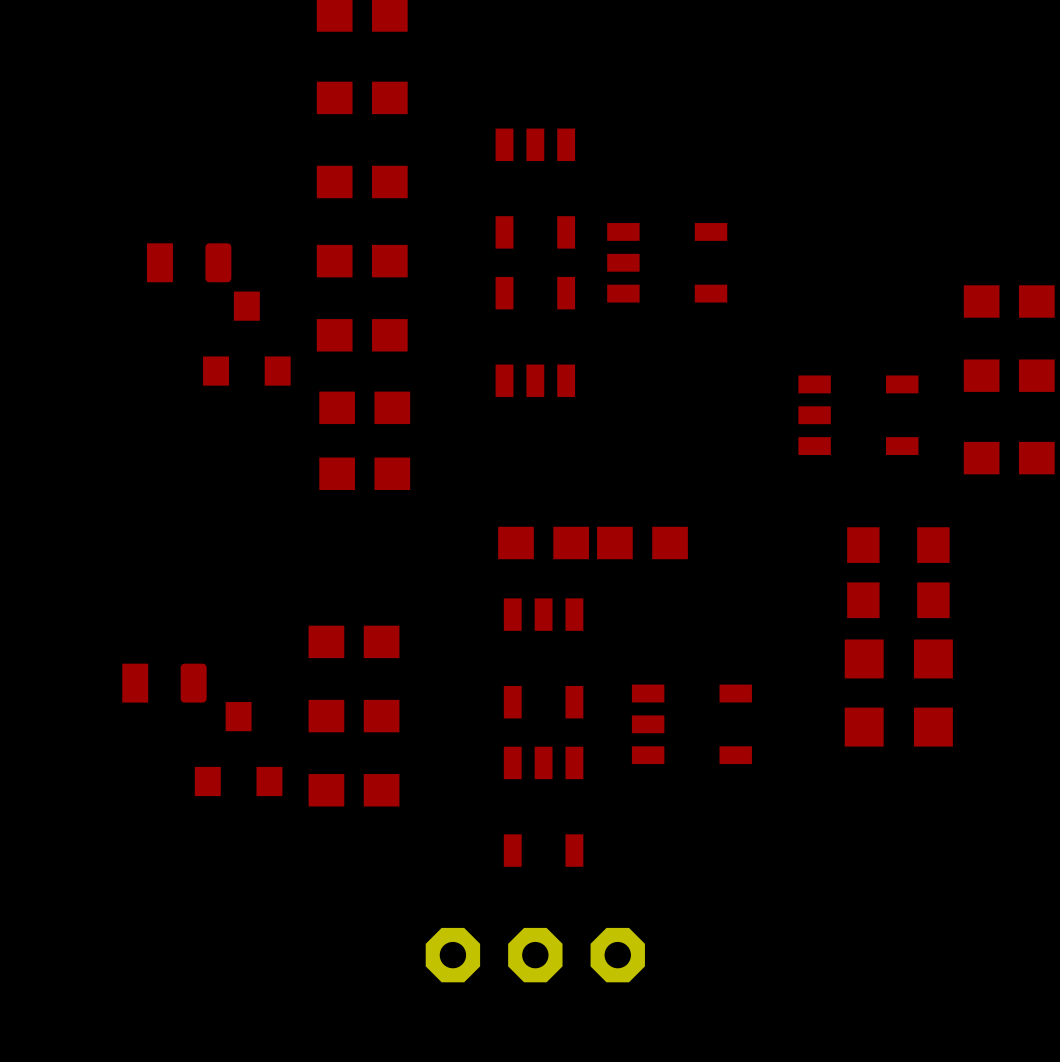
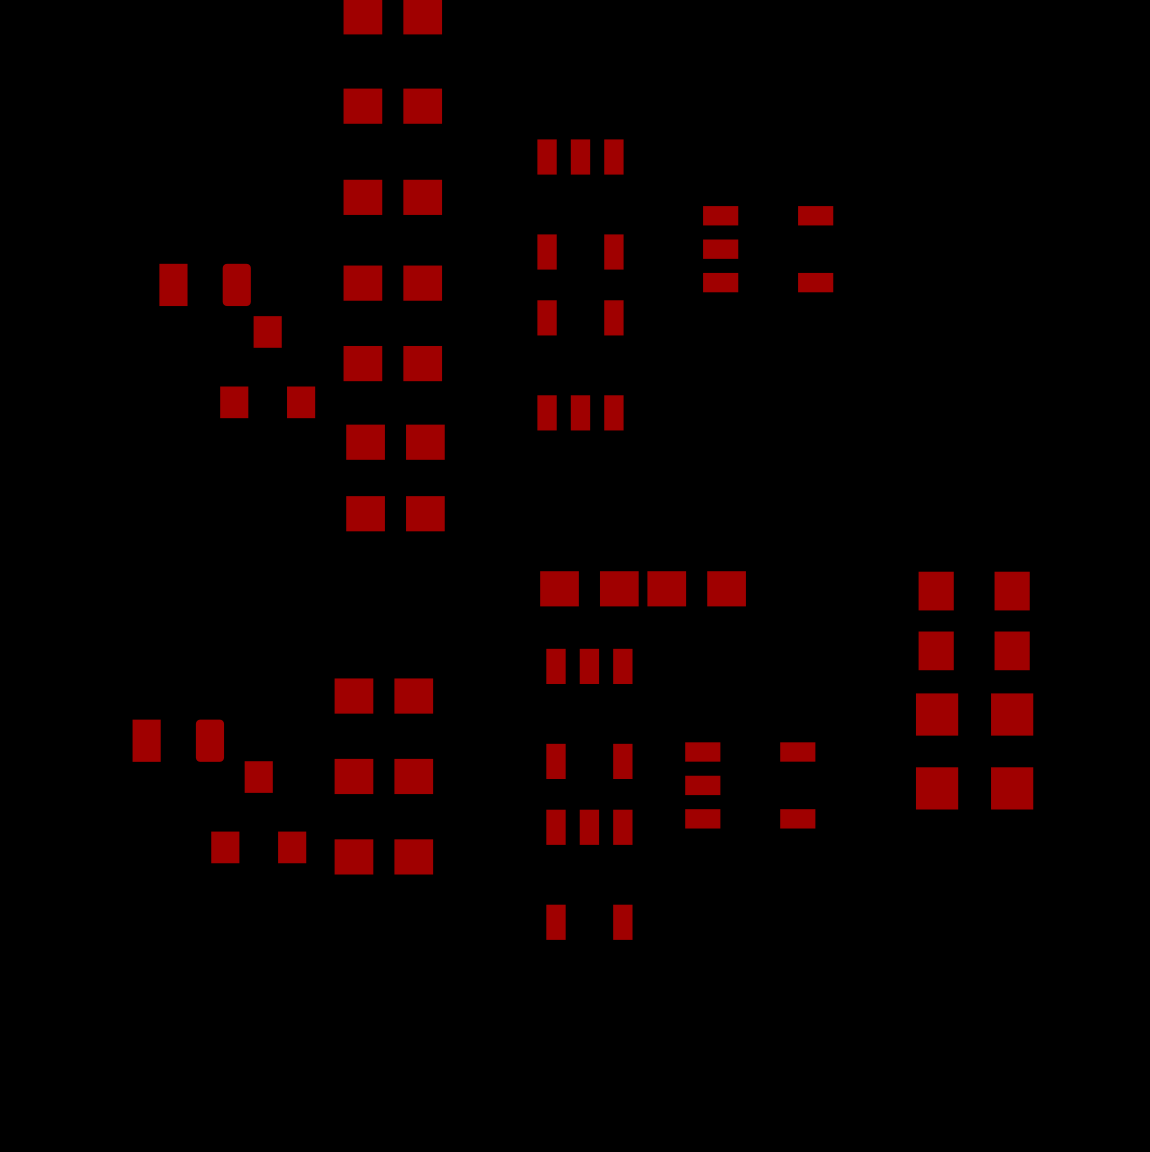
part position: (667, 262) -> (768, 249)
part: (1009, 301) -> none
part: (1009, 375) -> none
part: (858, 415) -> none
part: (1009, 458) -> none
part: (535, 955) -> none

